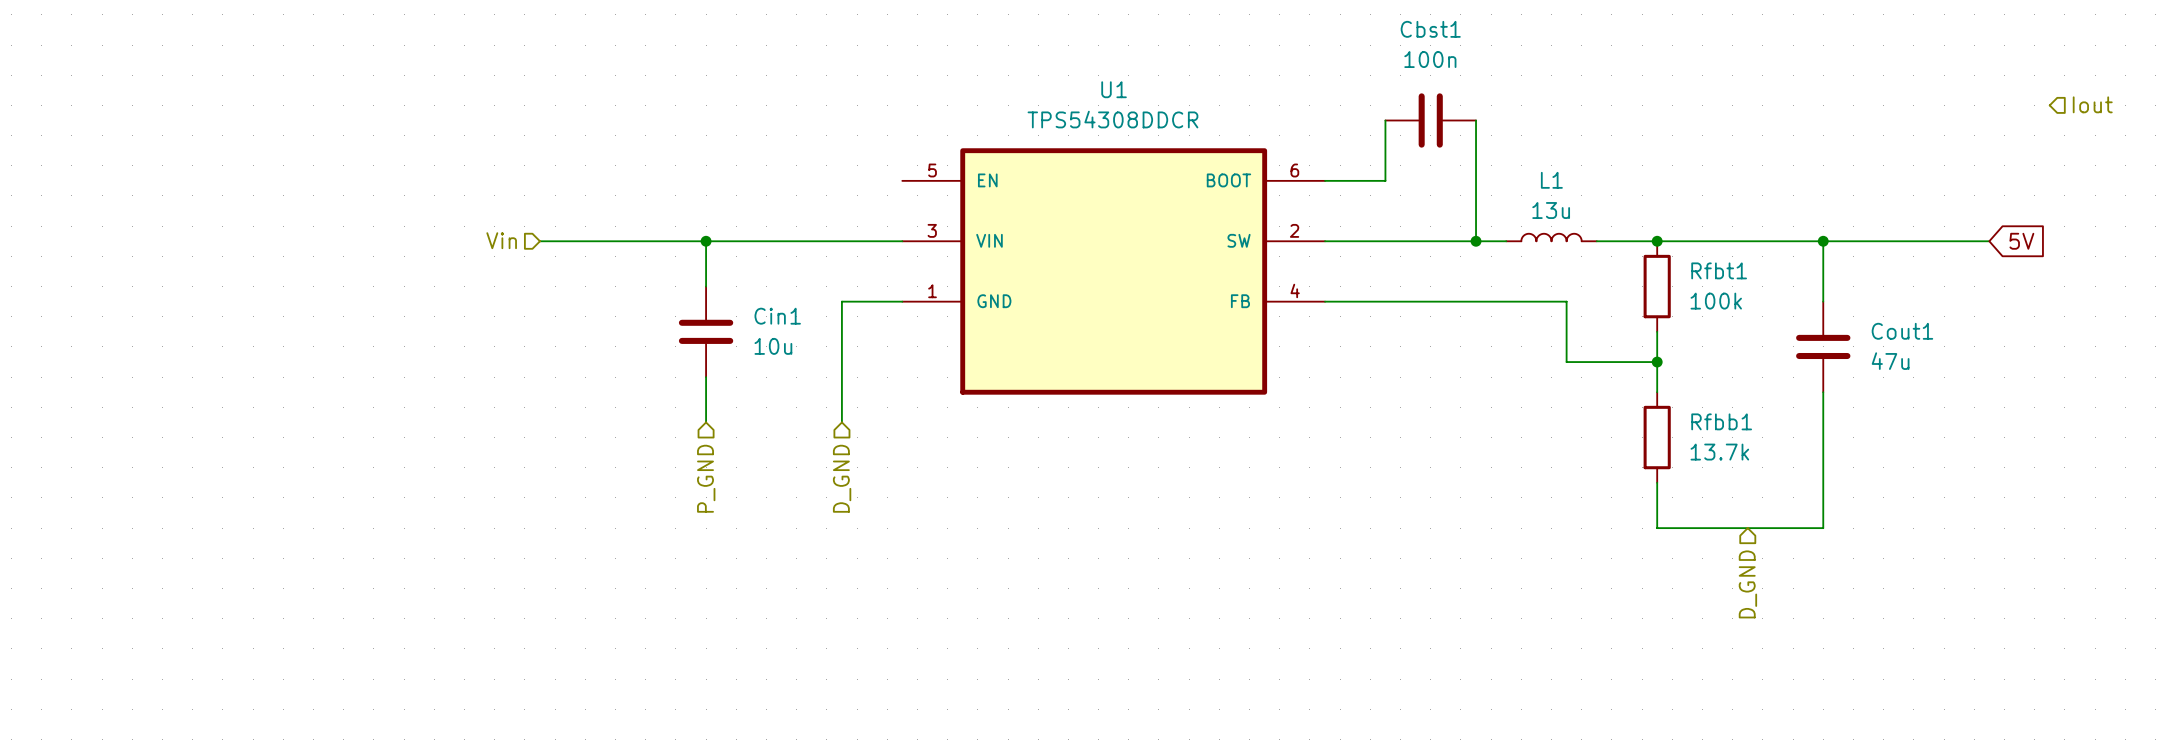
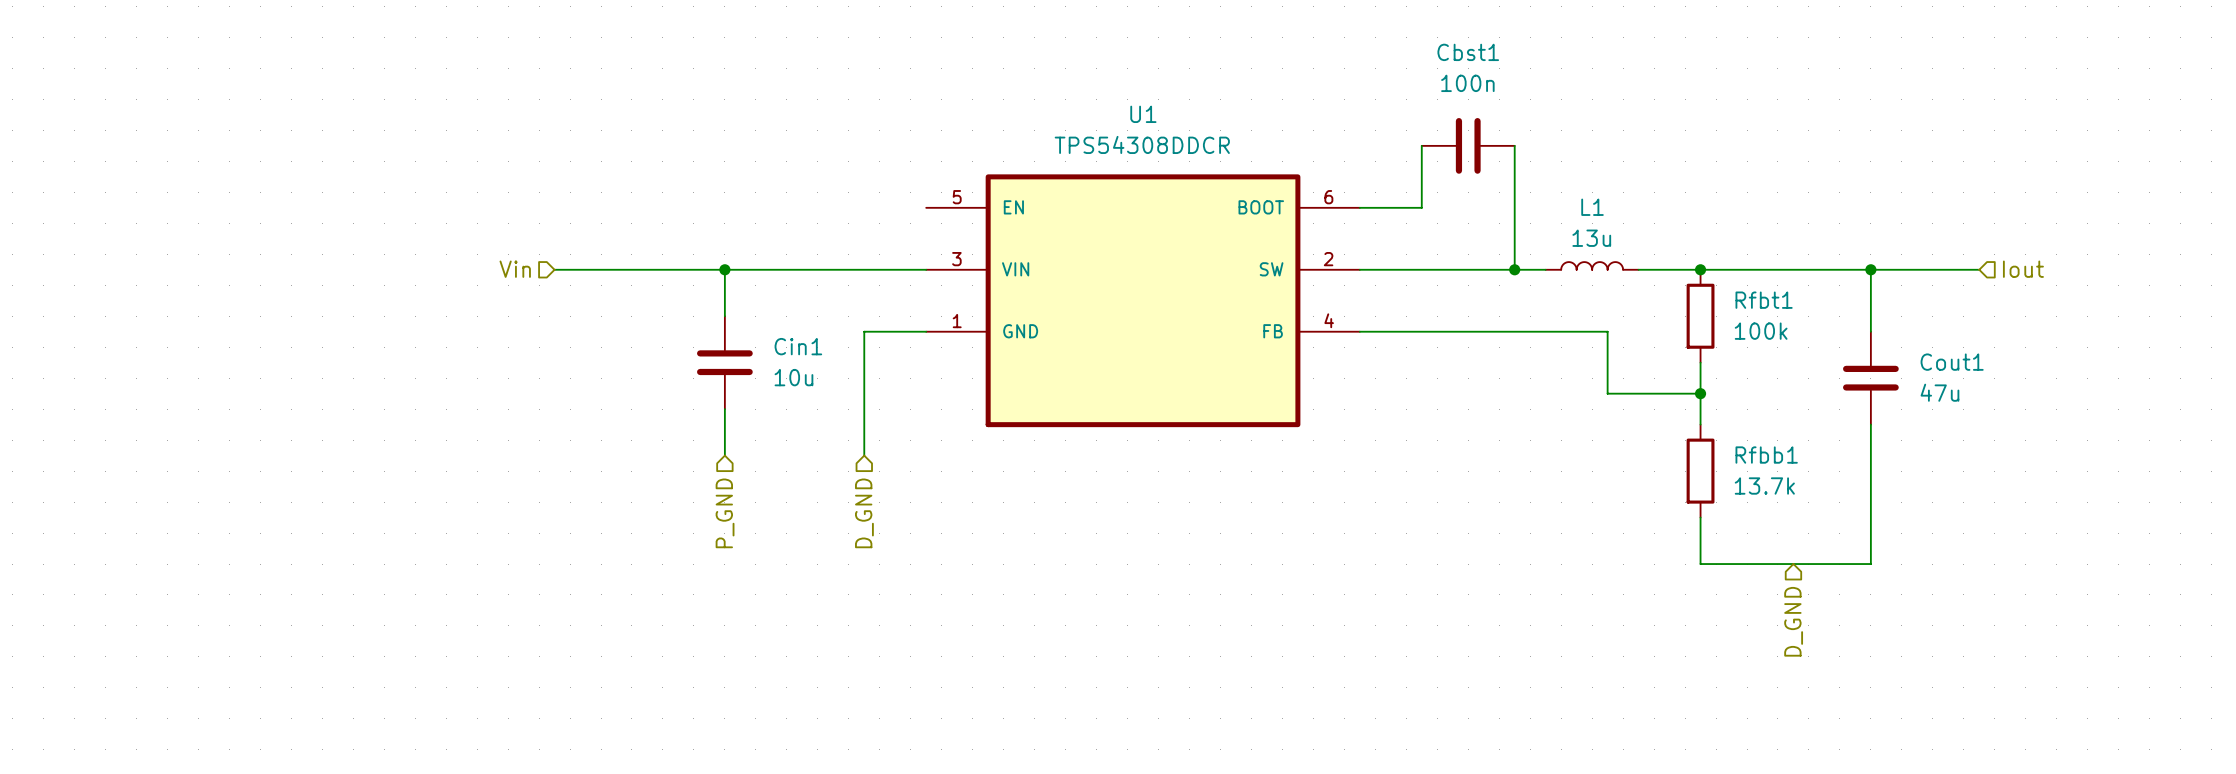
hierarchical label position: Iout (2092, 104) -> Iout (2023, 269)
wire: (1928, 241) (1989, 241) -> none
global label: 5V (2021, 241) -> none

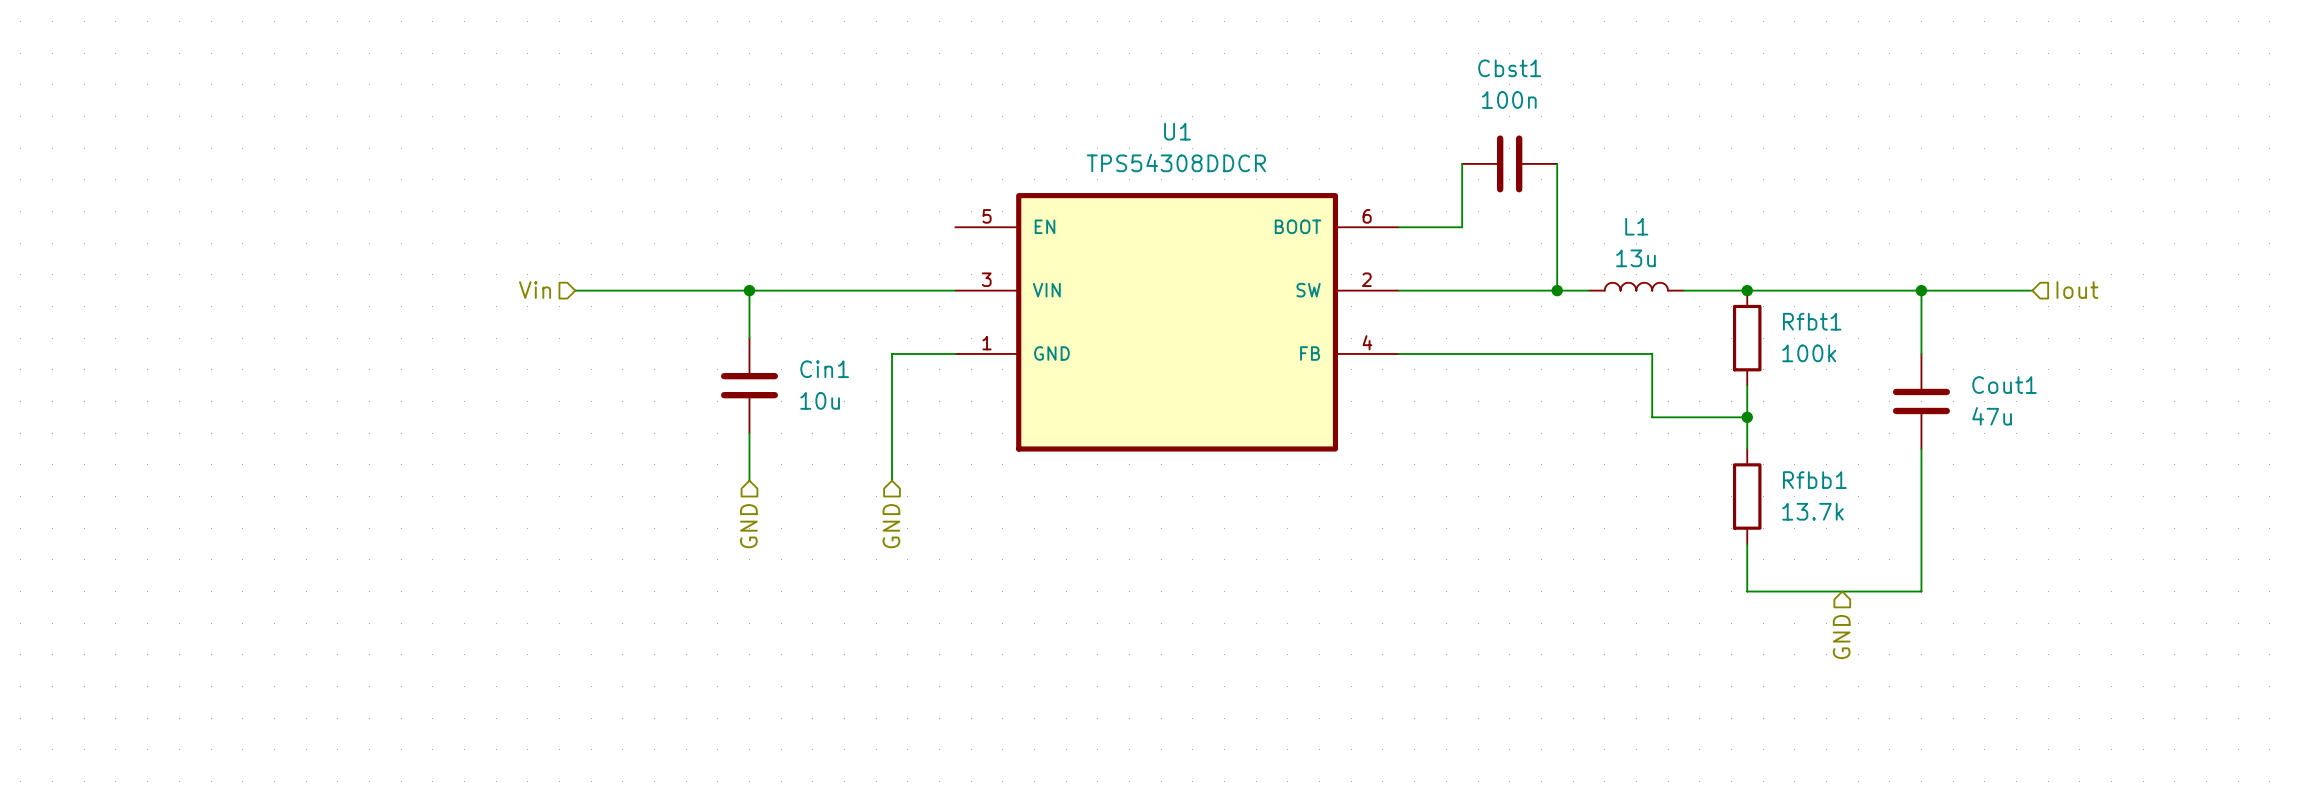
hierarchical label: P_GND (725, 513) -> GND (748, 526)
hierarchical label: D_GND (864, 513) -> GND (891, 526)
hierarchical label: D_GND (1793, 621) -> GND (1841, 637)

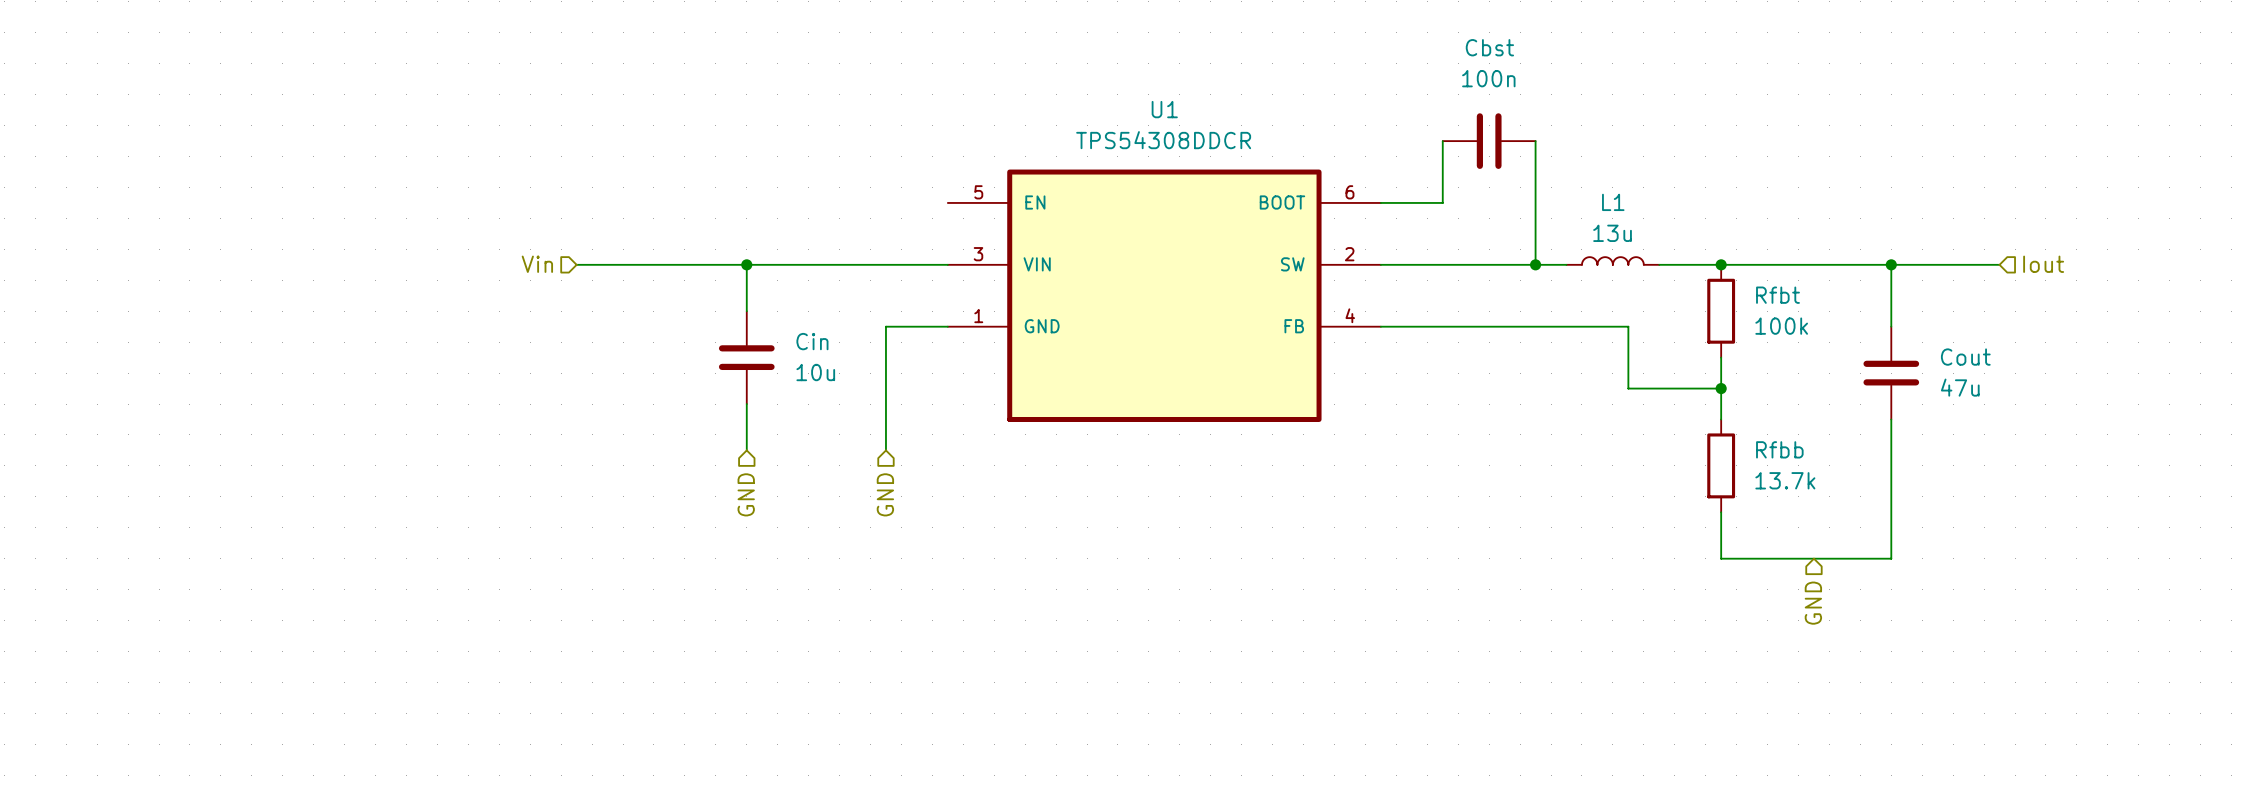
Cbst1 name: Cbst1 (1509, 68) -> Cbst (1489, 47)
Rfbt1 name: Rfbt1 (1812, 321) -> Rfbt (1777, 295)
Cin1 name: Cin1 (824, 369) -> Cin (812, 341)
Cout1 name: Cout1 (2004, 385) -> Cout (1965, 357)
Rfbb1 name: Rfbb1 (1814, 480) -> Rfbb (1779, 449)

